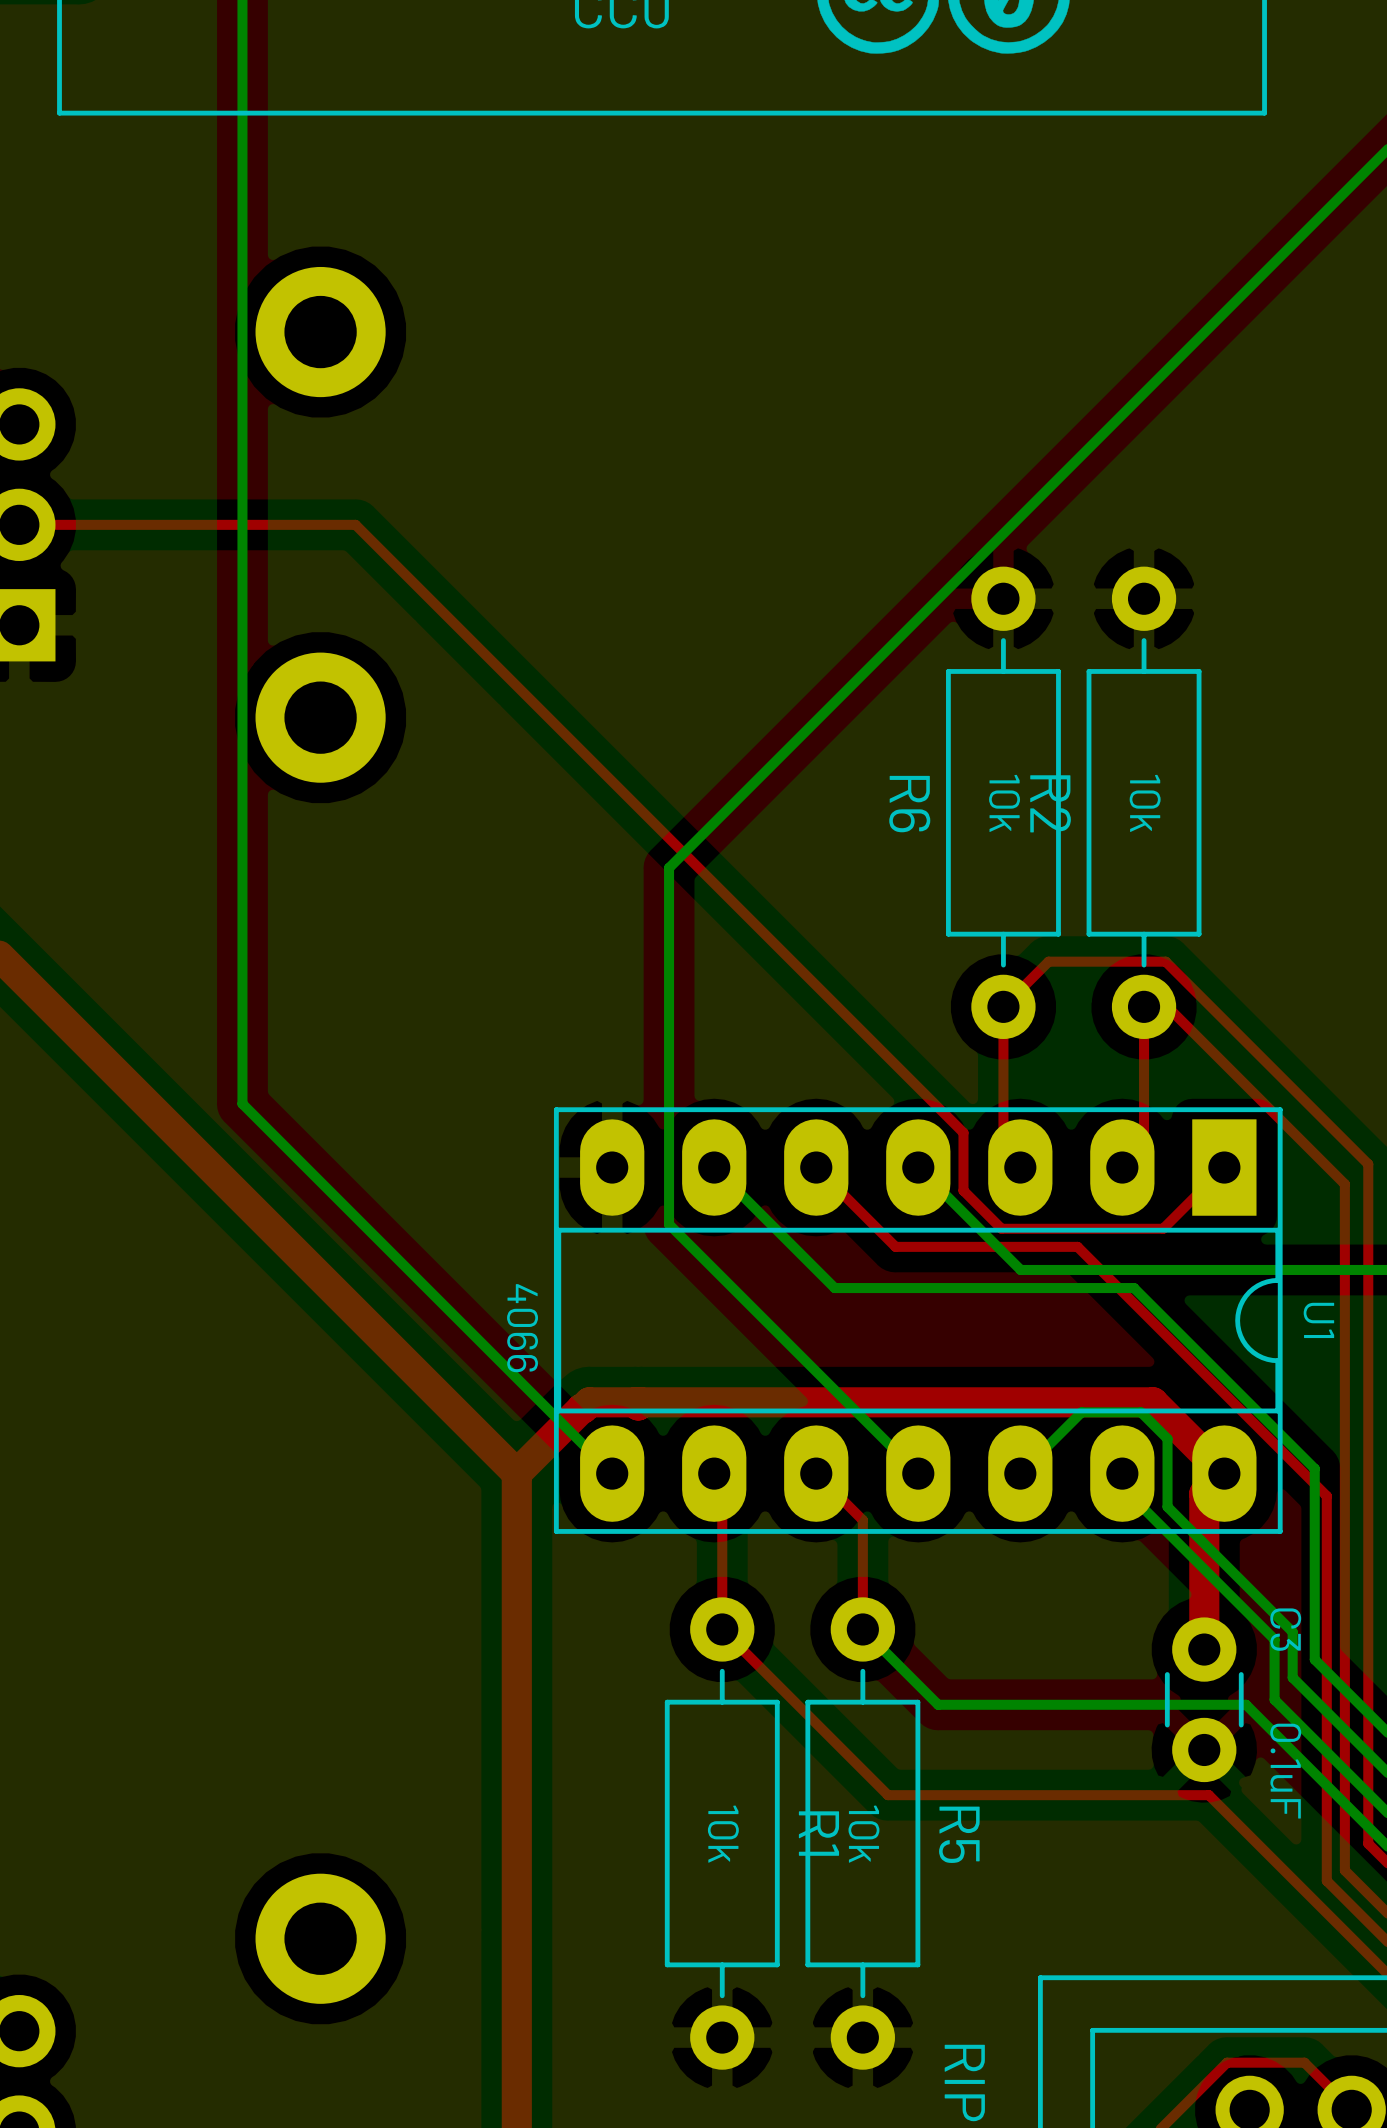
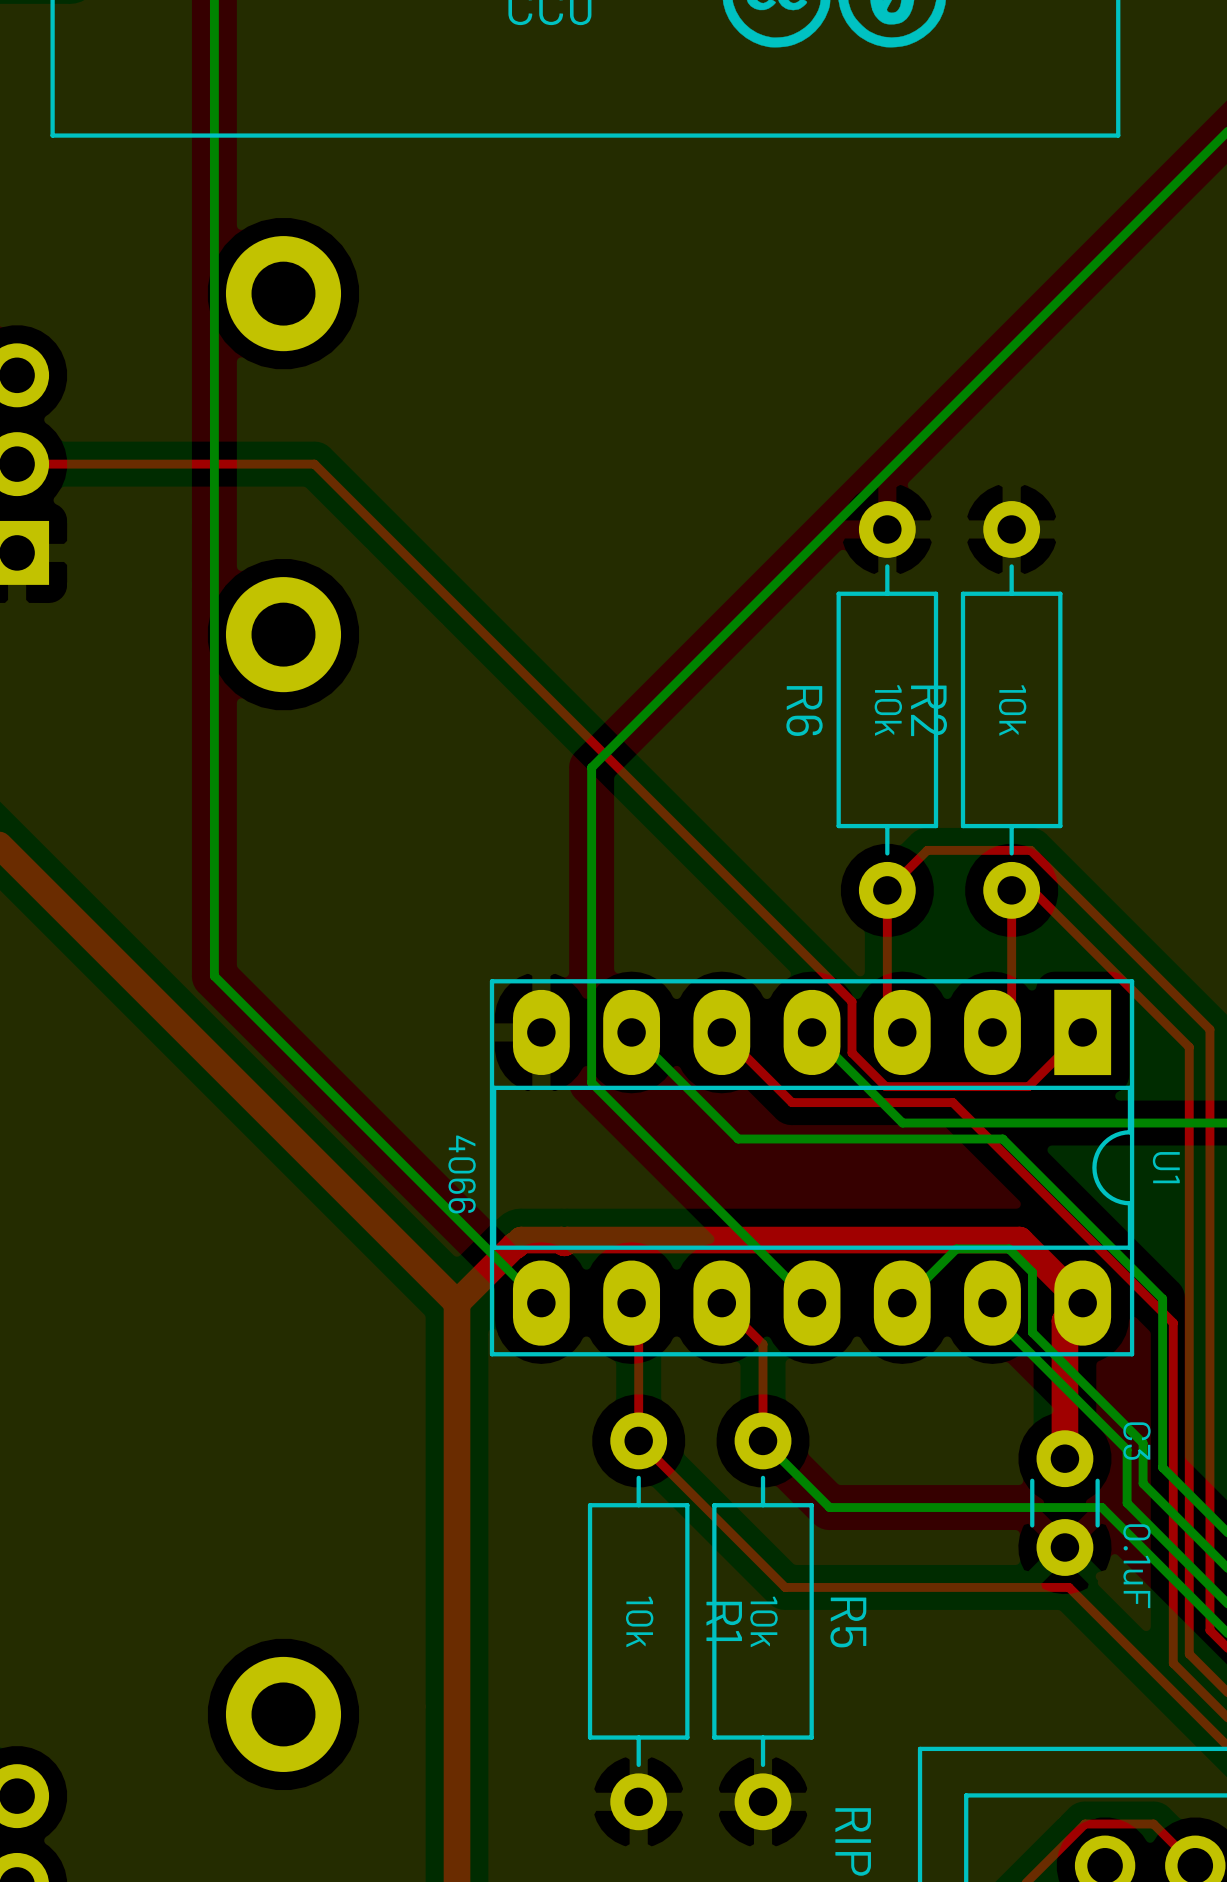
line: (1264, 113) (59, 113) -> (1118, 100) (1118, 135) (52, 135) (52, 100)

